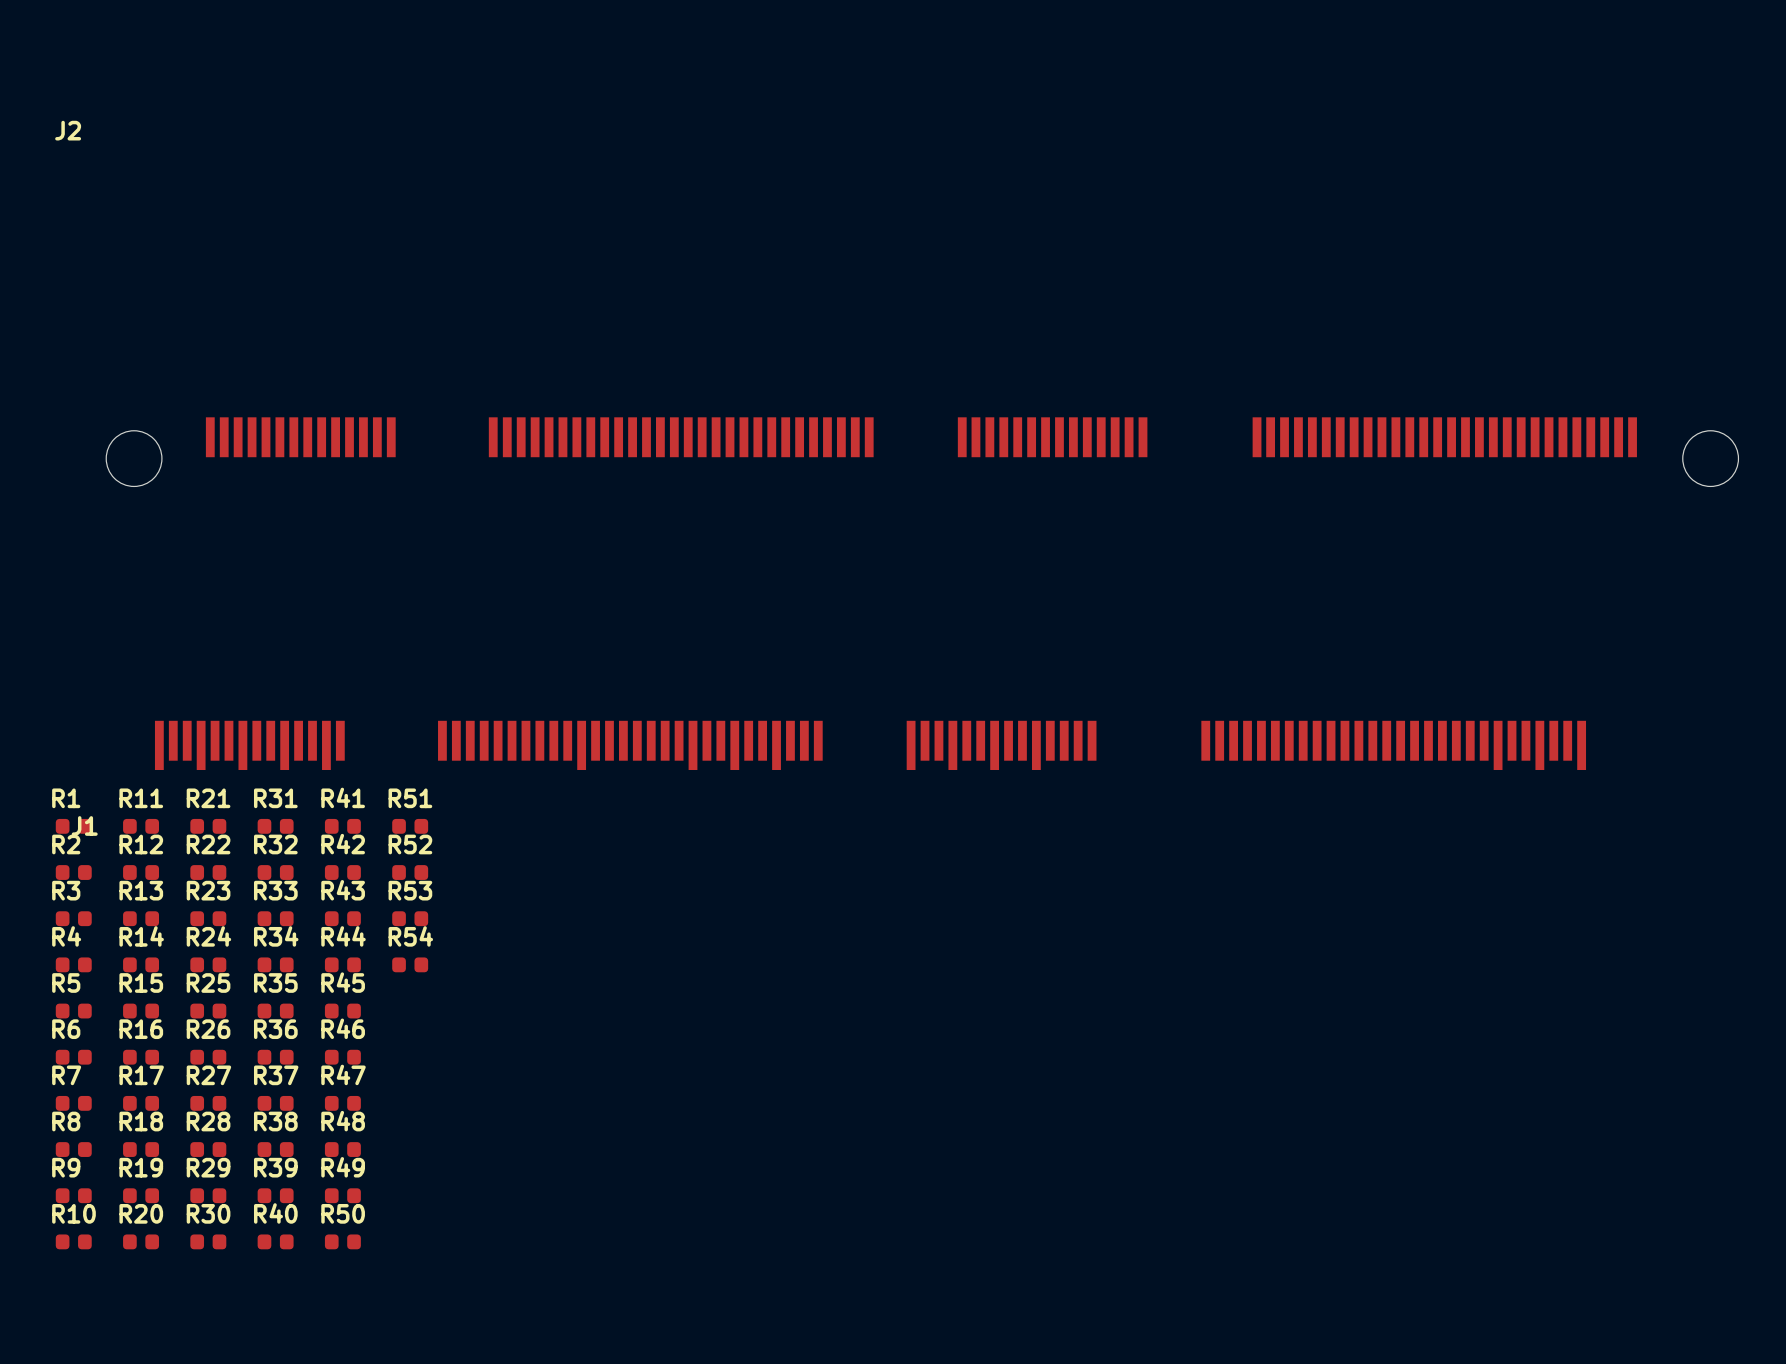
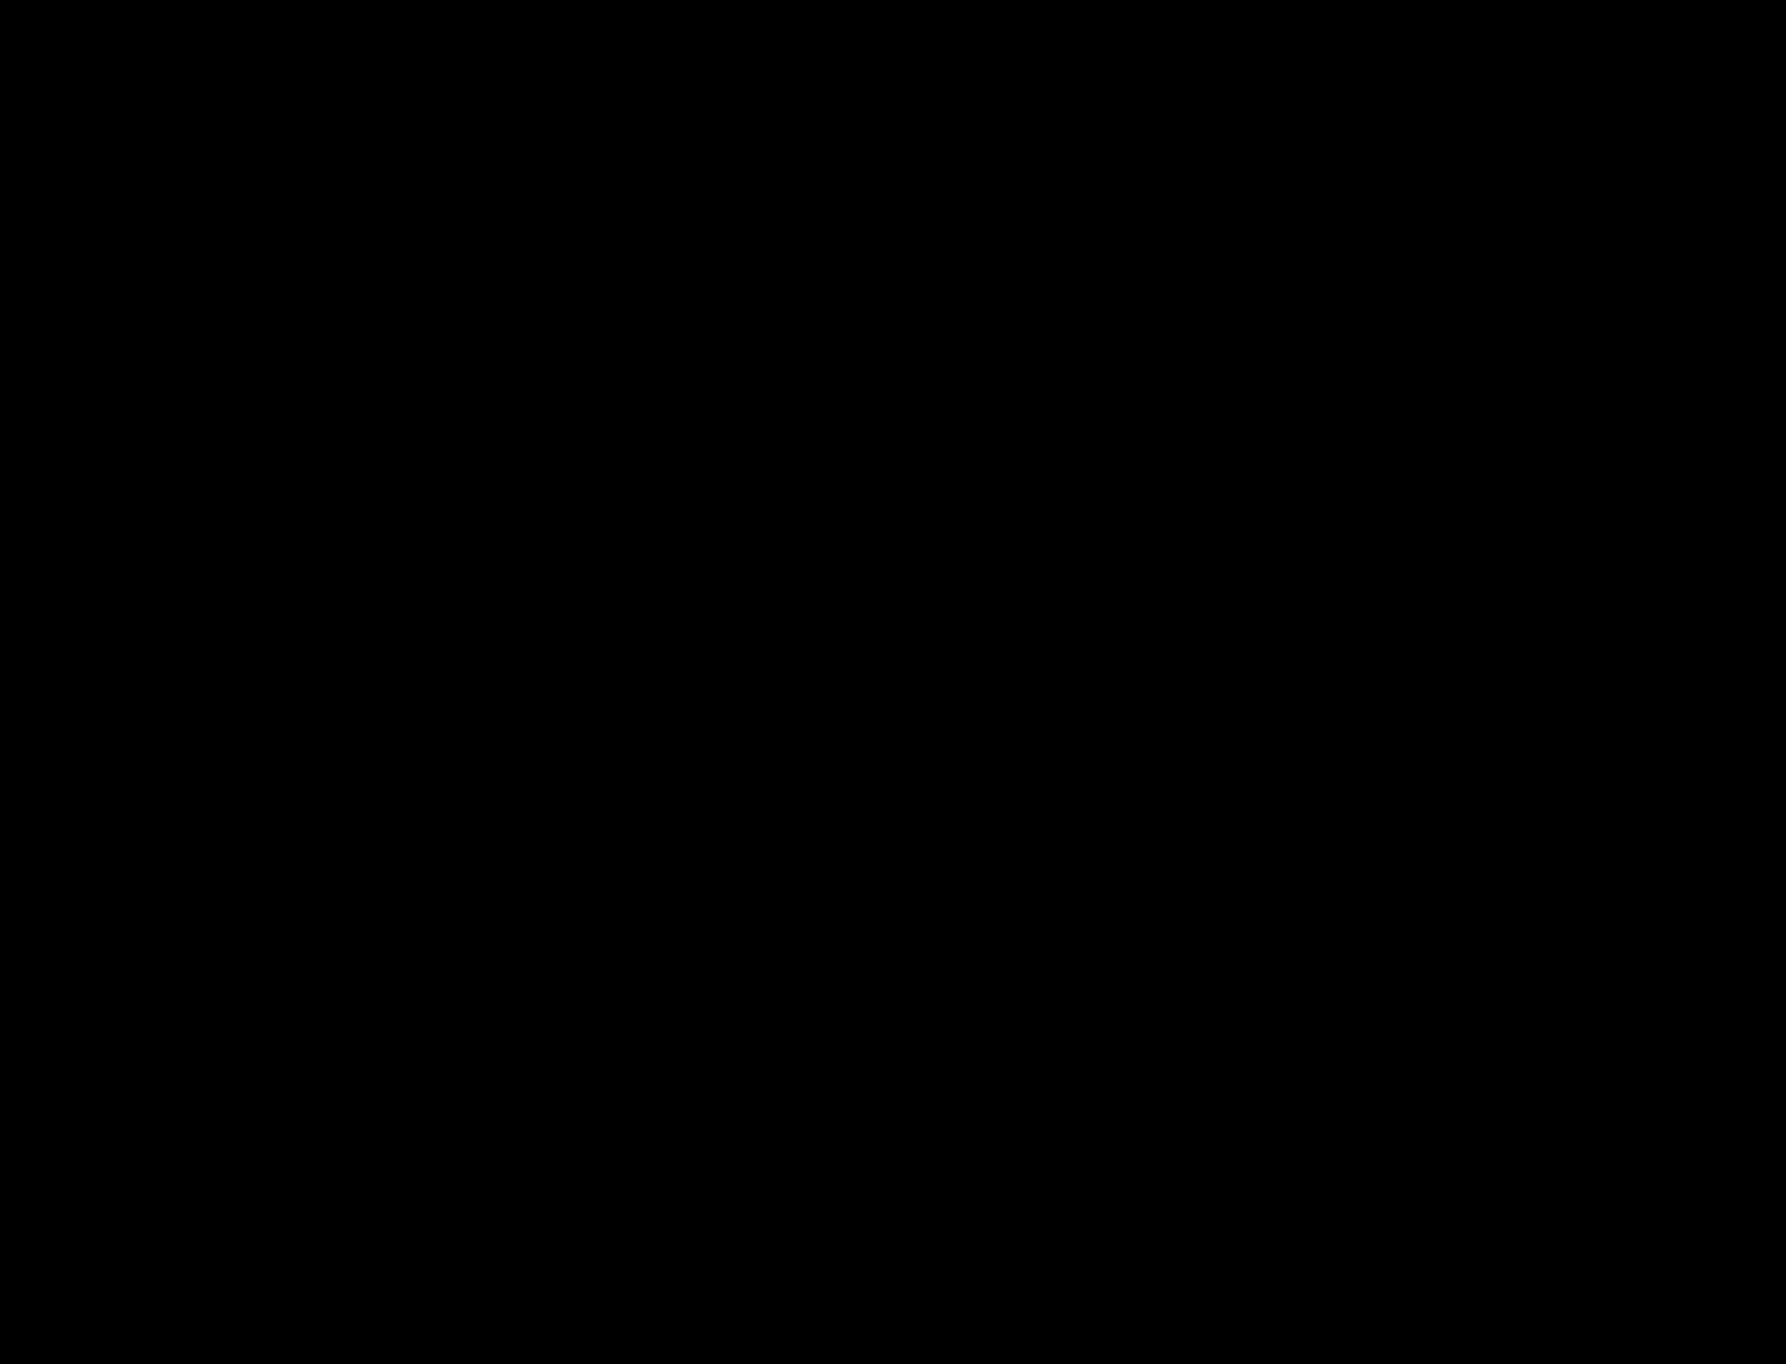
J2: (922, 451) -> none
J1: (870, 745) -> none
R1: (73, 826) -> none
R11: (141, 826) -> none
R21: (208, 826) -> none
R31: (275, 826) -> none
R41: (342, 826) -> none
R51: (410, 826) -> none
R2: (73, 872) -> none
R12: (141, 872) -> none
R22: (208, 872) -> none
R32: (275, 872) -> none
R42: (342, 872) -> none
R52: (410, 872) -> none
R3: (73, 918) -> none
R13: (141, 918) -> none
R23: (208, 918) -> none
R33: (275, 918) -> none
R43: (342, 918) -> none
R53: (410, 918) -> none
R4: (73, 964) -> none
R14: (141, 964) -> none
R24: (208, 964) -> none
R34: (275, 964) -> none
R44: (342, 964) -> none
R54: (410, 964) -> none
R5: (73, 1011) -> none
R15: (141, 1011) -> none
R25: (208, 1011) -> none
R35: (275, 1011) -> none
R45: (342, 1011) -> none
R6: (73, 1057) -> none
R16: (141, 1057) -> none
R26: (208, 1057) -> none
R36: (275, 1057) -> none
R46: (342, 1057) -> none
R7: (73, 1103) -> none
R17: (141, 1103) -> none
R27: (208, 1103) -> none
R37: (275, 1103) -> none
R47: (342, 1103) -> none
R8: (73, 1149) -> none
R18: (141, 1149) -> none
R28: (208, 1149) -> none
R38: (275, 1149) -> none
R48: (342, 1149) -> none
R9: (73, 1195) -> none
R19: (141, 1195) -> none
R29: (208, 1195) -> none
R39: (275, 1195) -> none
R49: (342, 1195) -> none
R10: (73, 1241) -> none
R20: (141, 1241) -> none
R30: (208, 1241) -> none
R40: (275, 1241) -> none
R50: (342, 1241) -> none

